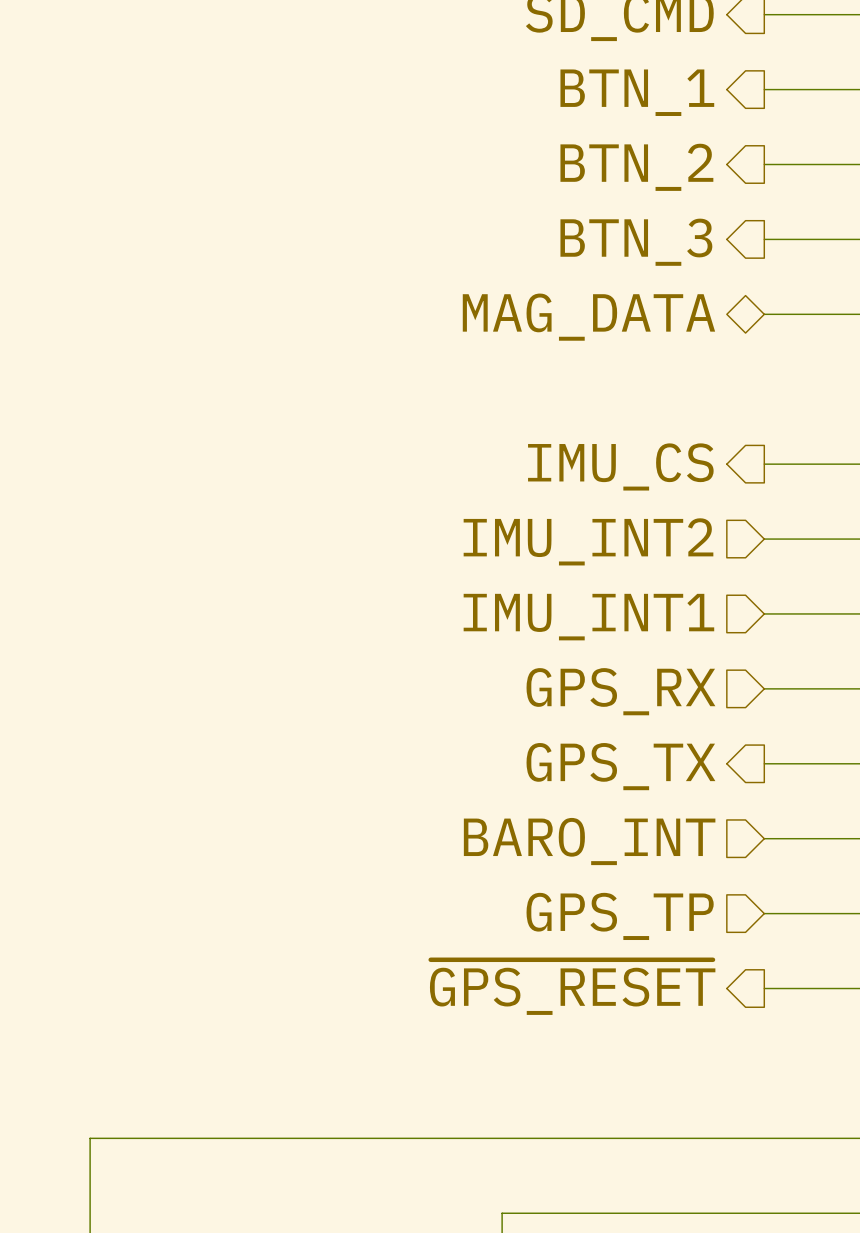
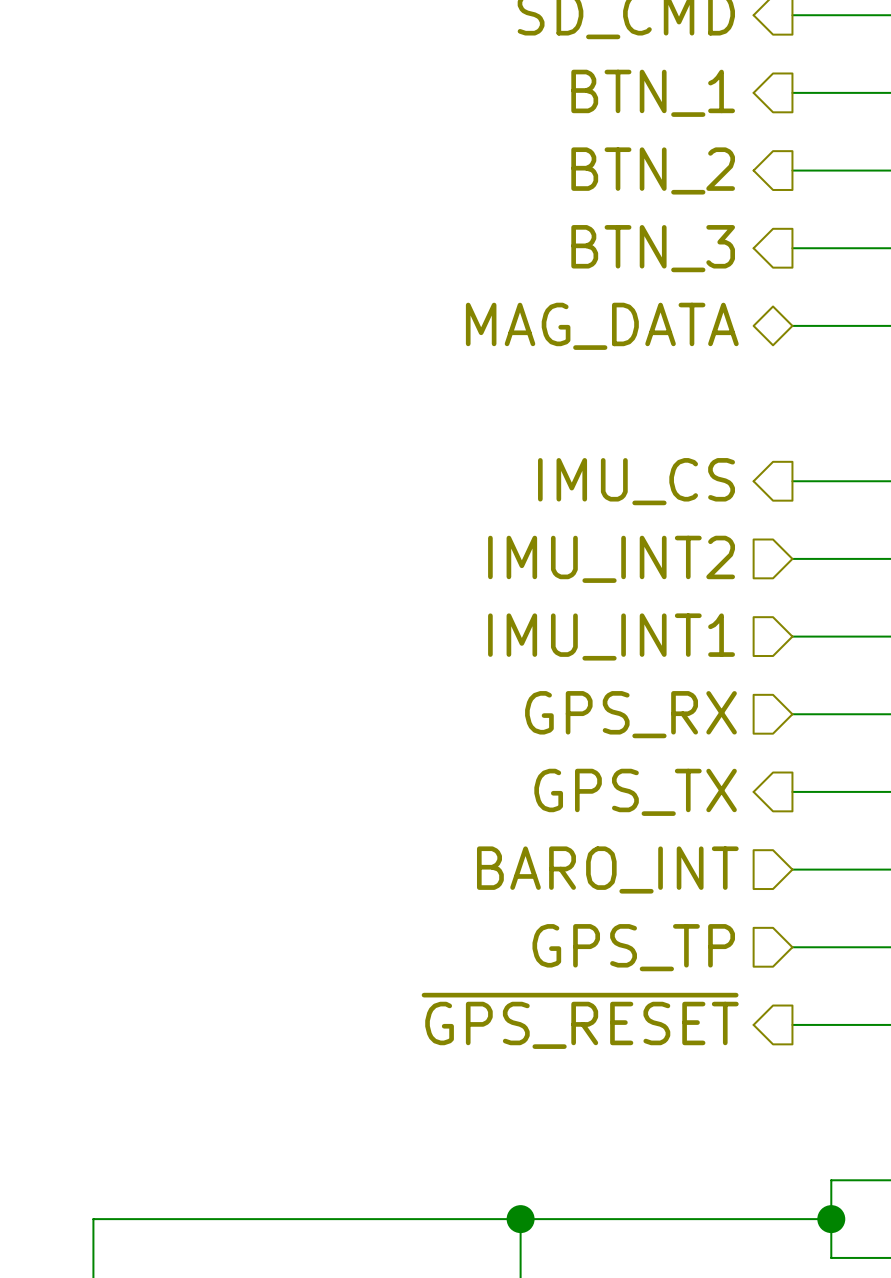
wire: (801, 1138) (90, 1138) (90, 1175) -> (831, 1219) (93, 1219)
wire: none -> (831, 1180) (831, 1257)
junction: none -> (520, 1219)
junction: none -> (831, 1219)
wire: (502, 1213) (801, 1213) -> (520, 1257) (520, 1219)

